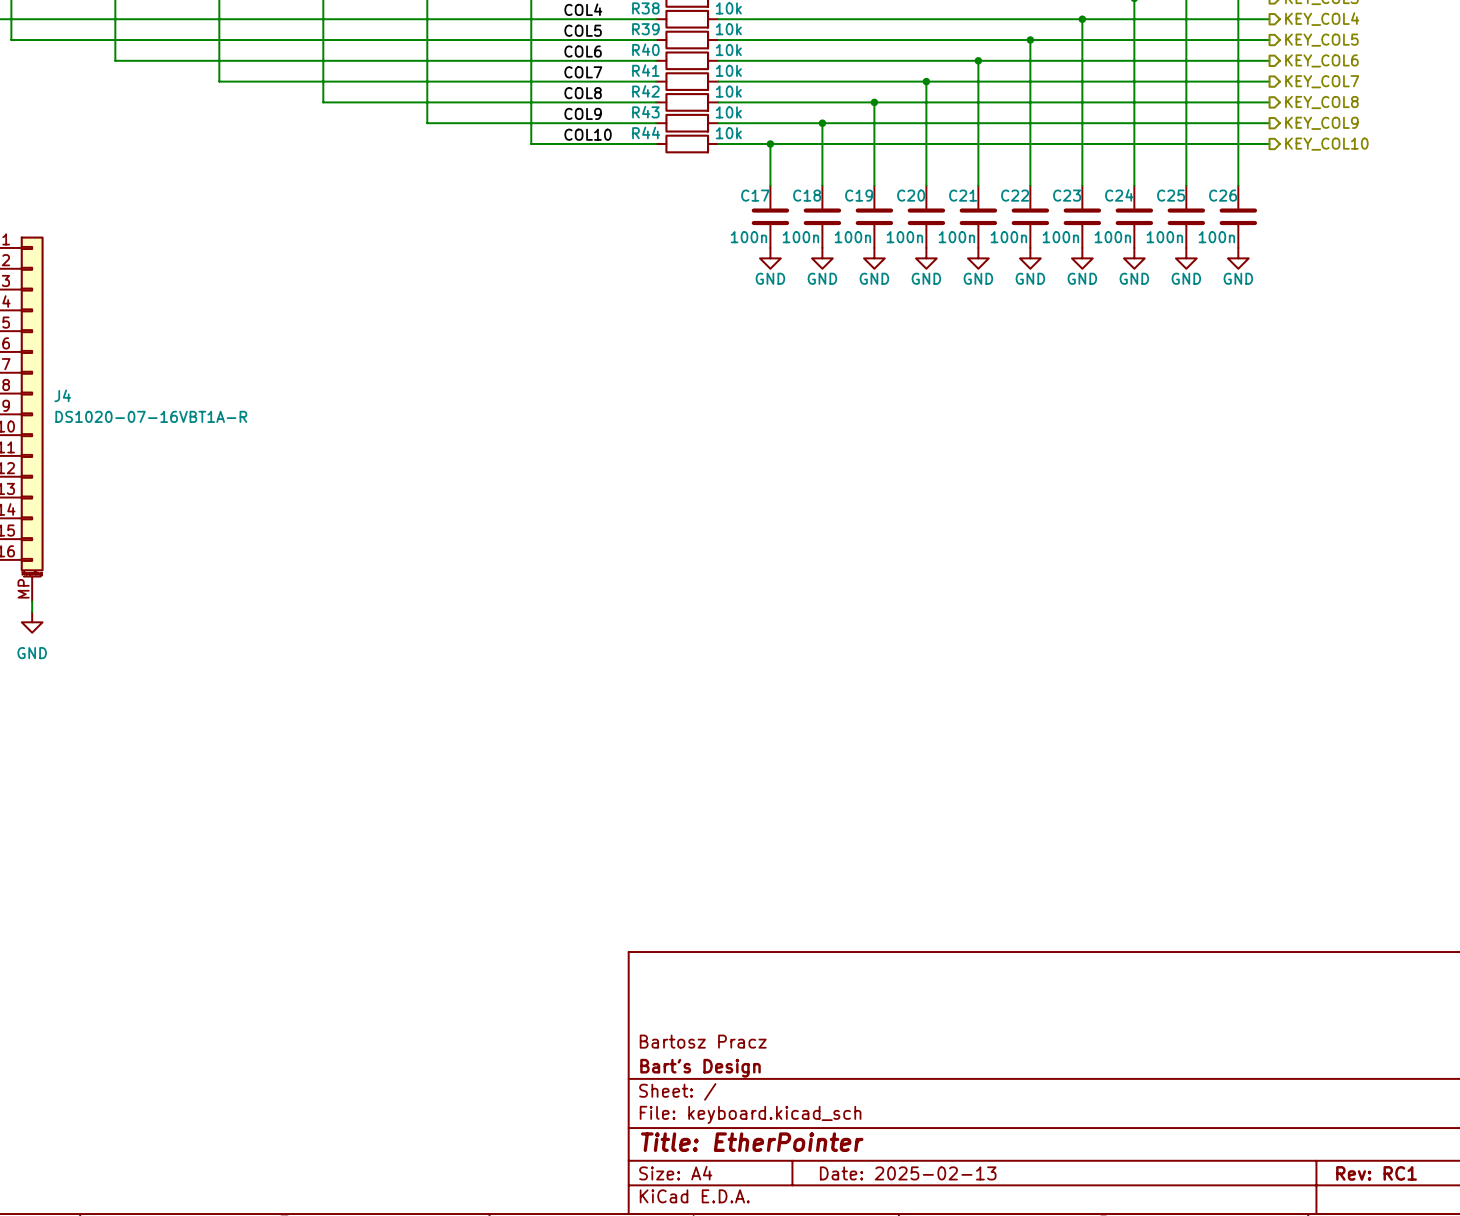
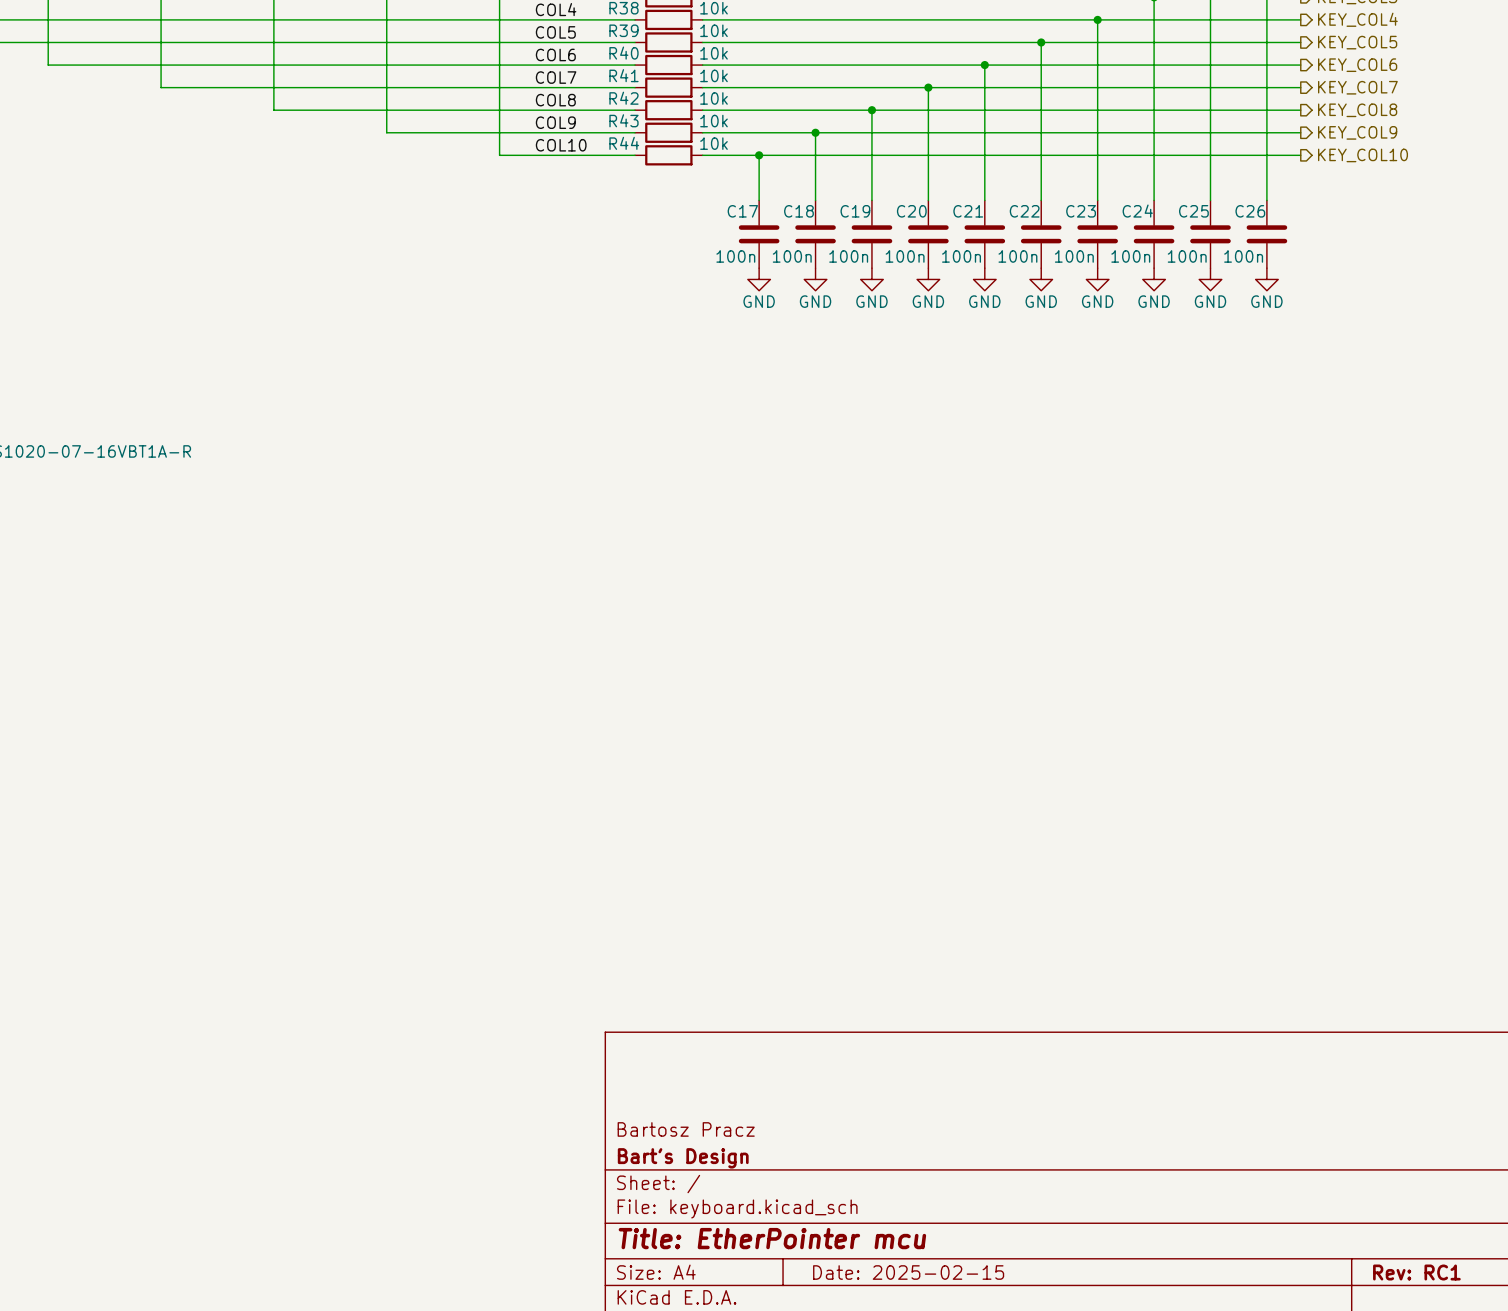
title block: Title: EtherPointer (752, 1142) -> Title: EtherPointer mcu (772, 1238)
title block: Date: 2025-02-13 (908, 1173) -> Date: 2025-02-15 (908, 1272)

